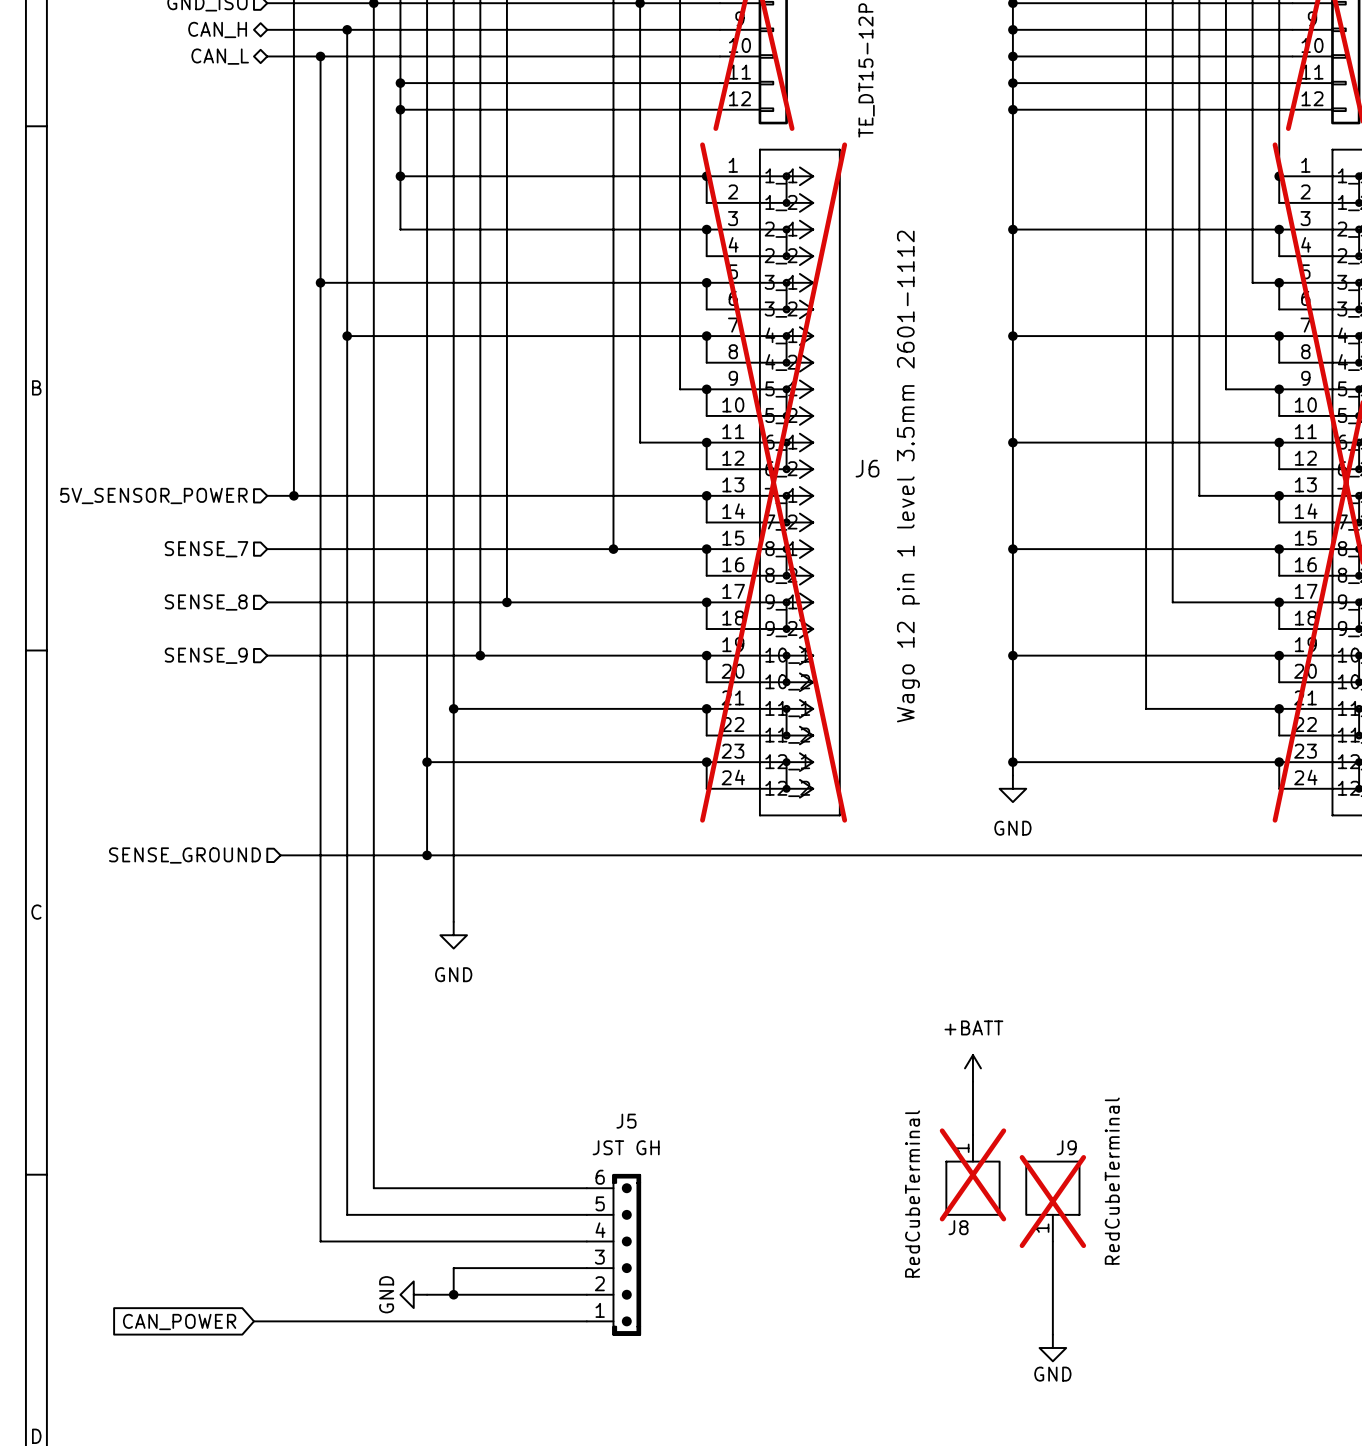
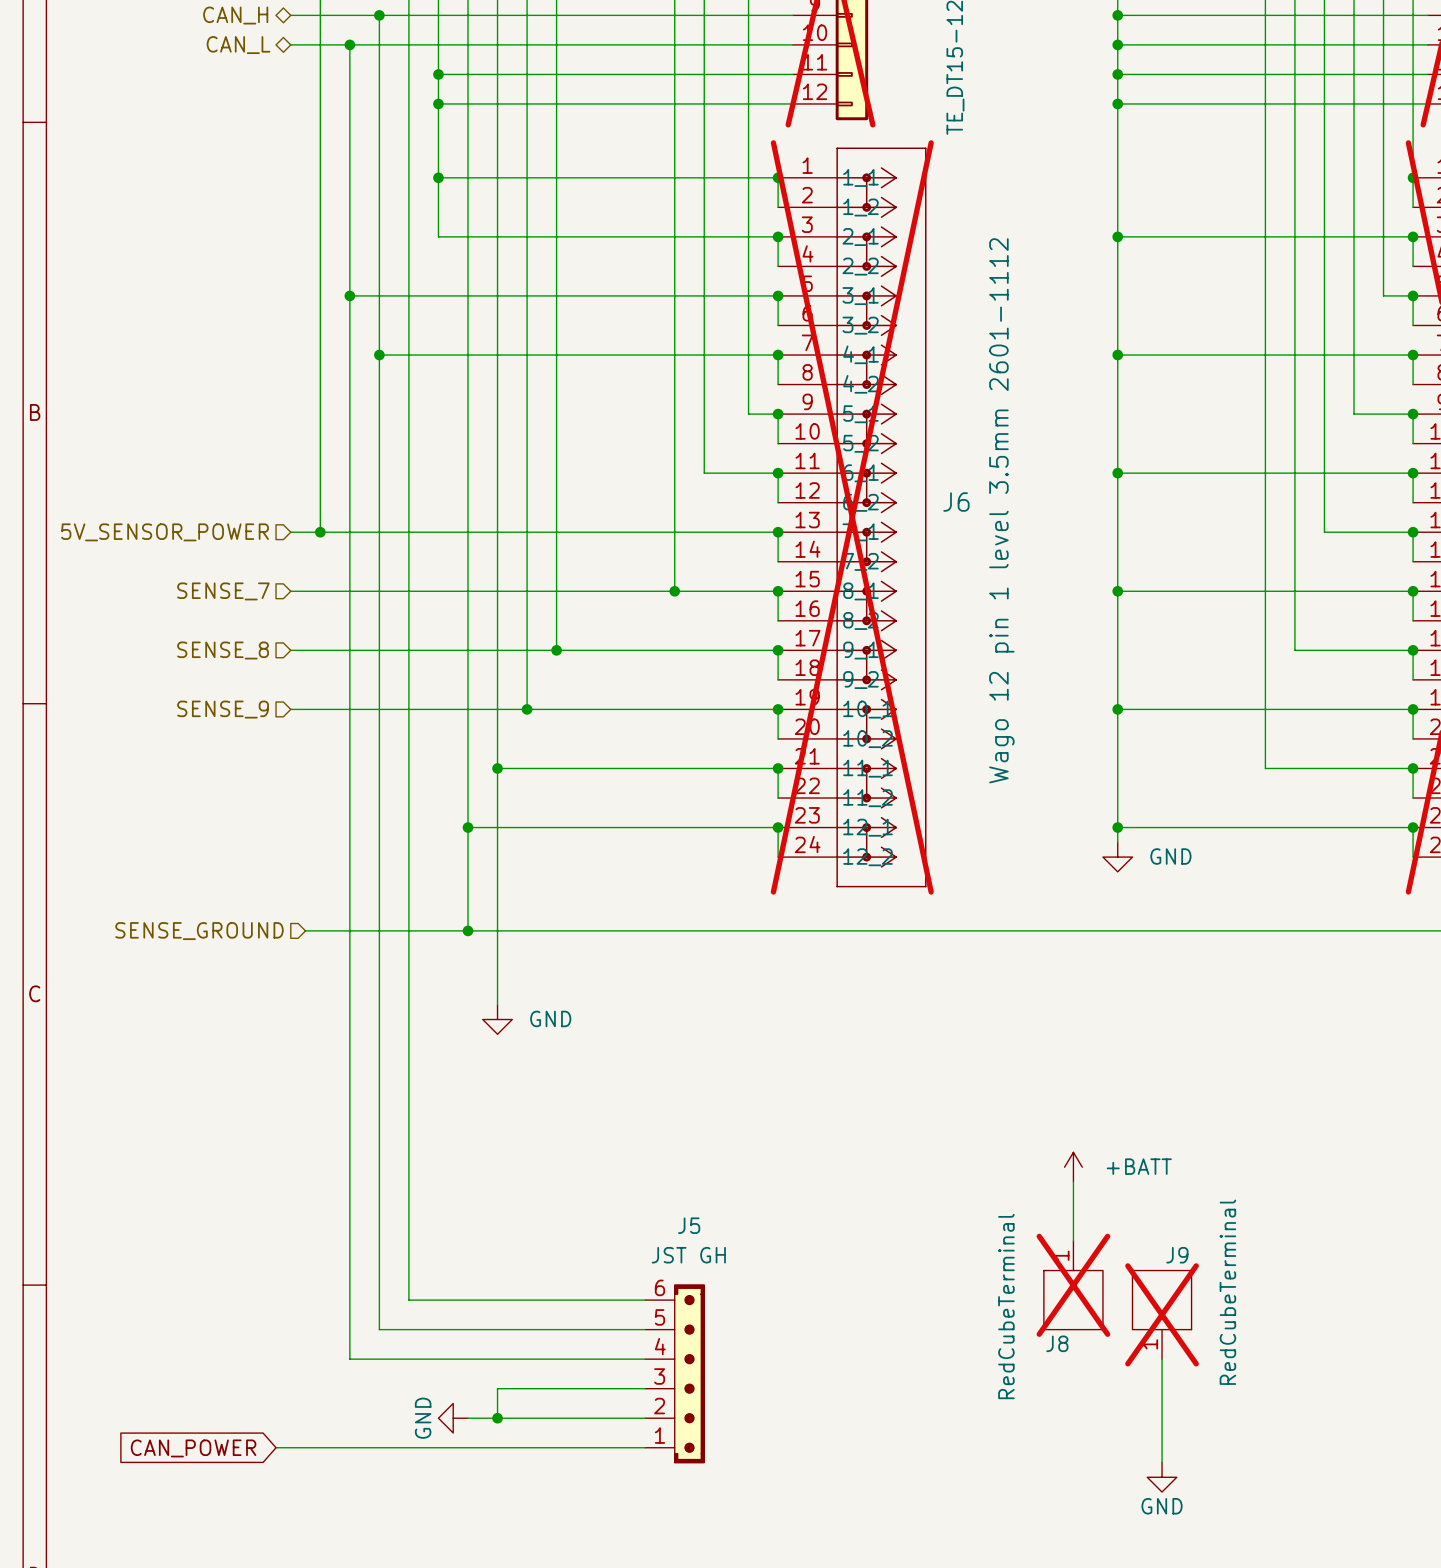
power symbol text position: GND (1012, 828) -> GND (1170, 856)
power symbol text position: GND (453, 974) -> GND (550, 1018)
power symbol text position: +BATT (973, 1027) -> +BATT (1139, 1166)

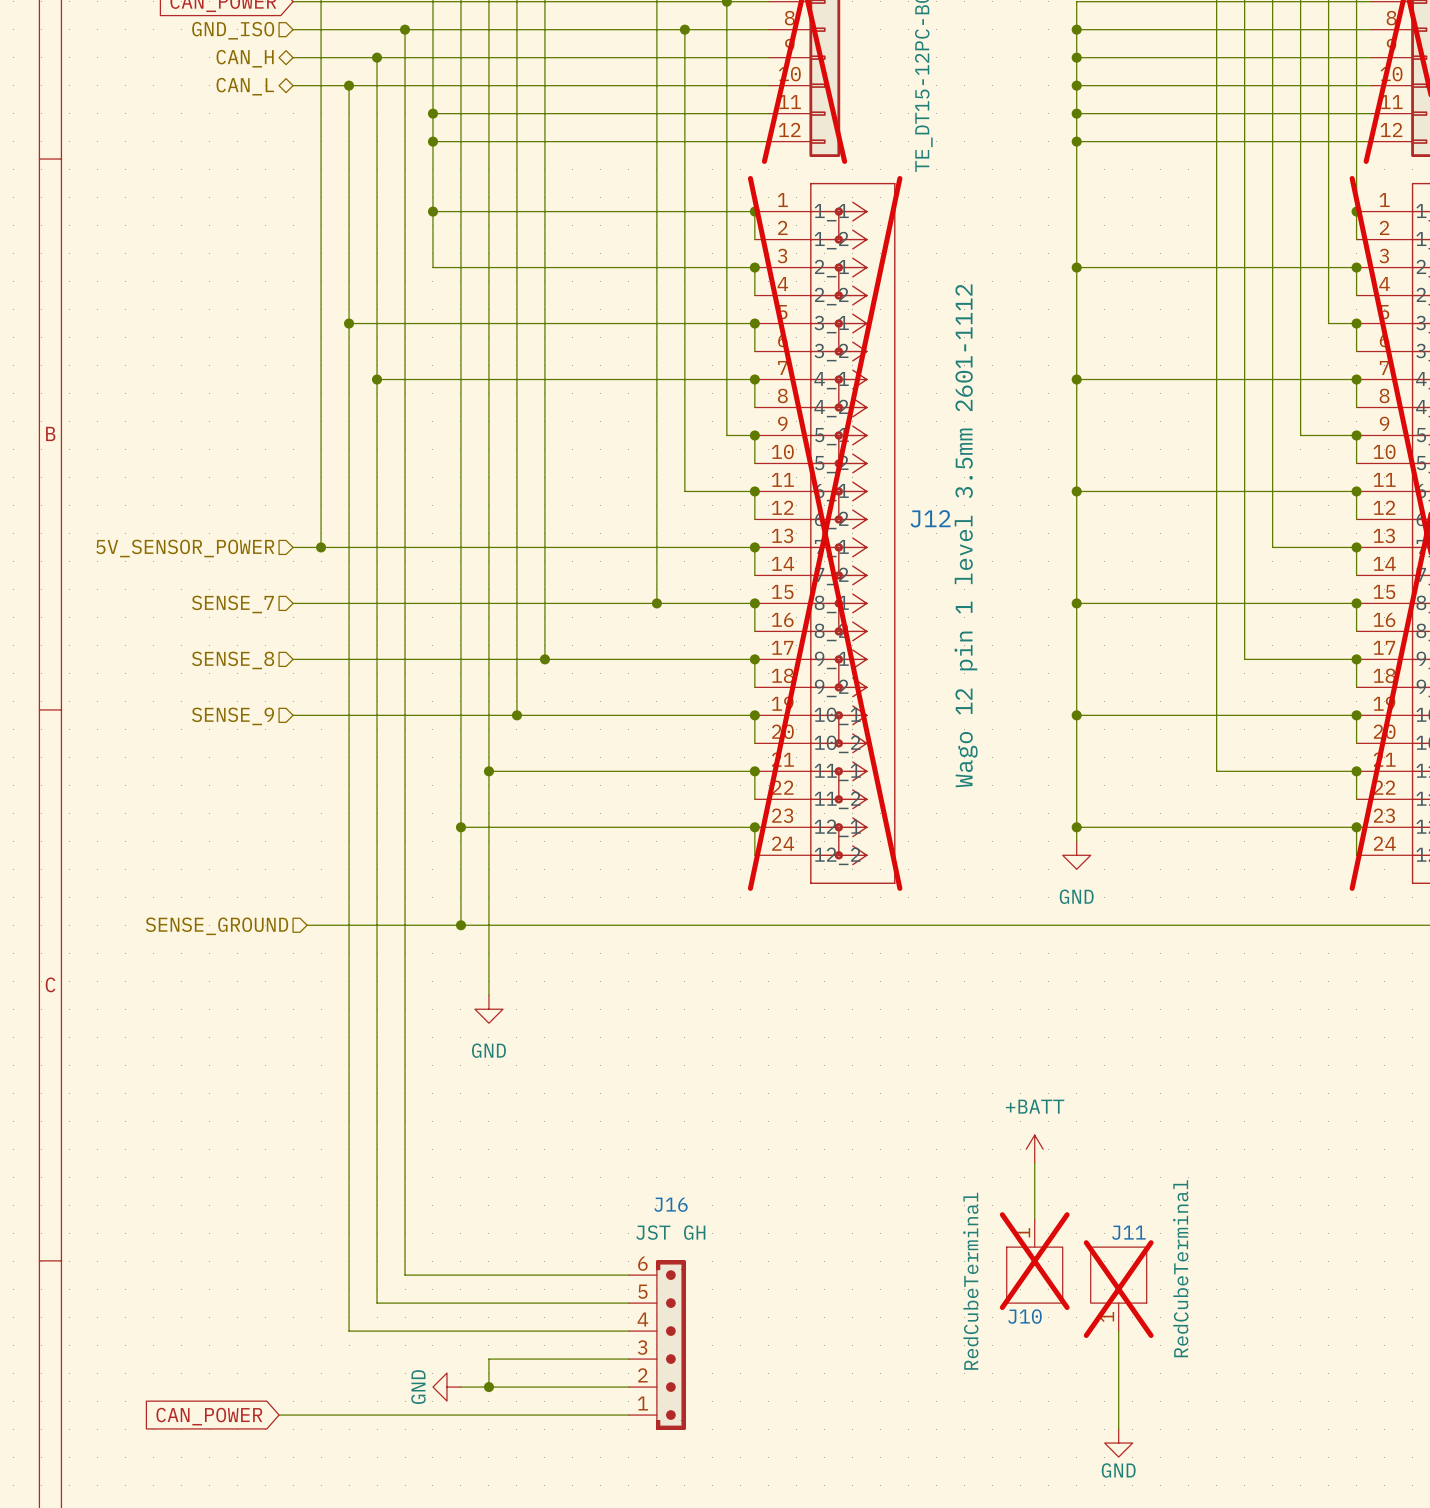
J6 name: J6 (956, 502) -> J12 (930, 518)
power symbol text position: GND (1170, 856) -> GND (1076, 896)
power symbol text position: GND (550, 1018) -> GND (488, 1050)
power symbol text position: +BATT (1139, 1166) -> +BATT (1035, 1106)
J5 name: J5 (689, 1225) -> J16 (670, 1204)
J9 name: J9 (1177, 1255) -> J11 (1128, 1232)
J8 name: J8 (1057, 1343) -> J10 (1024, 1316)

